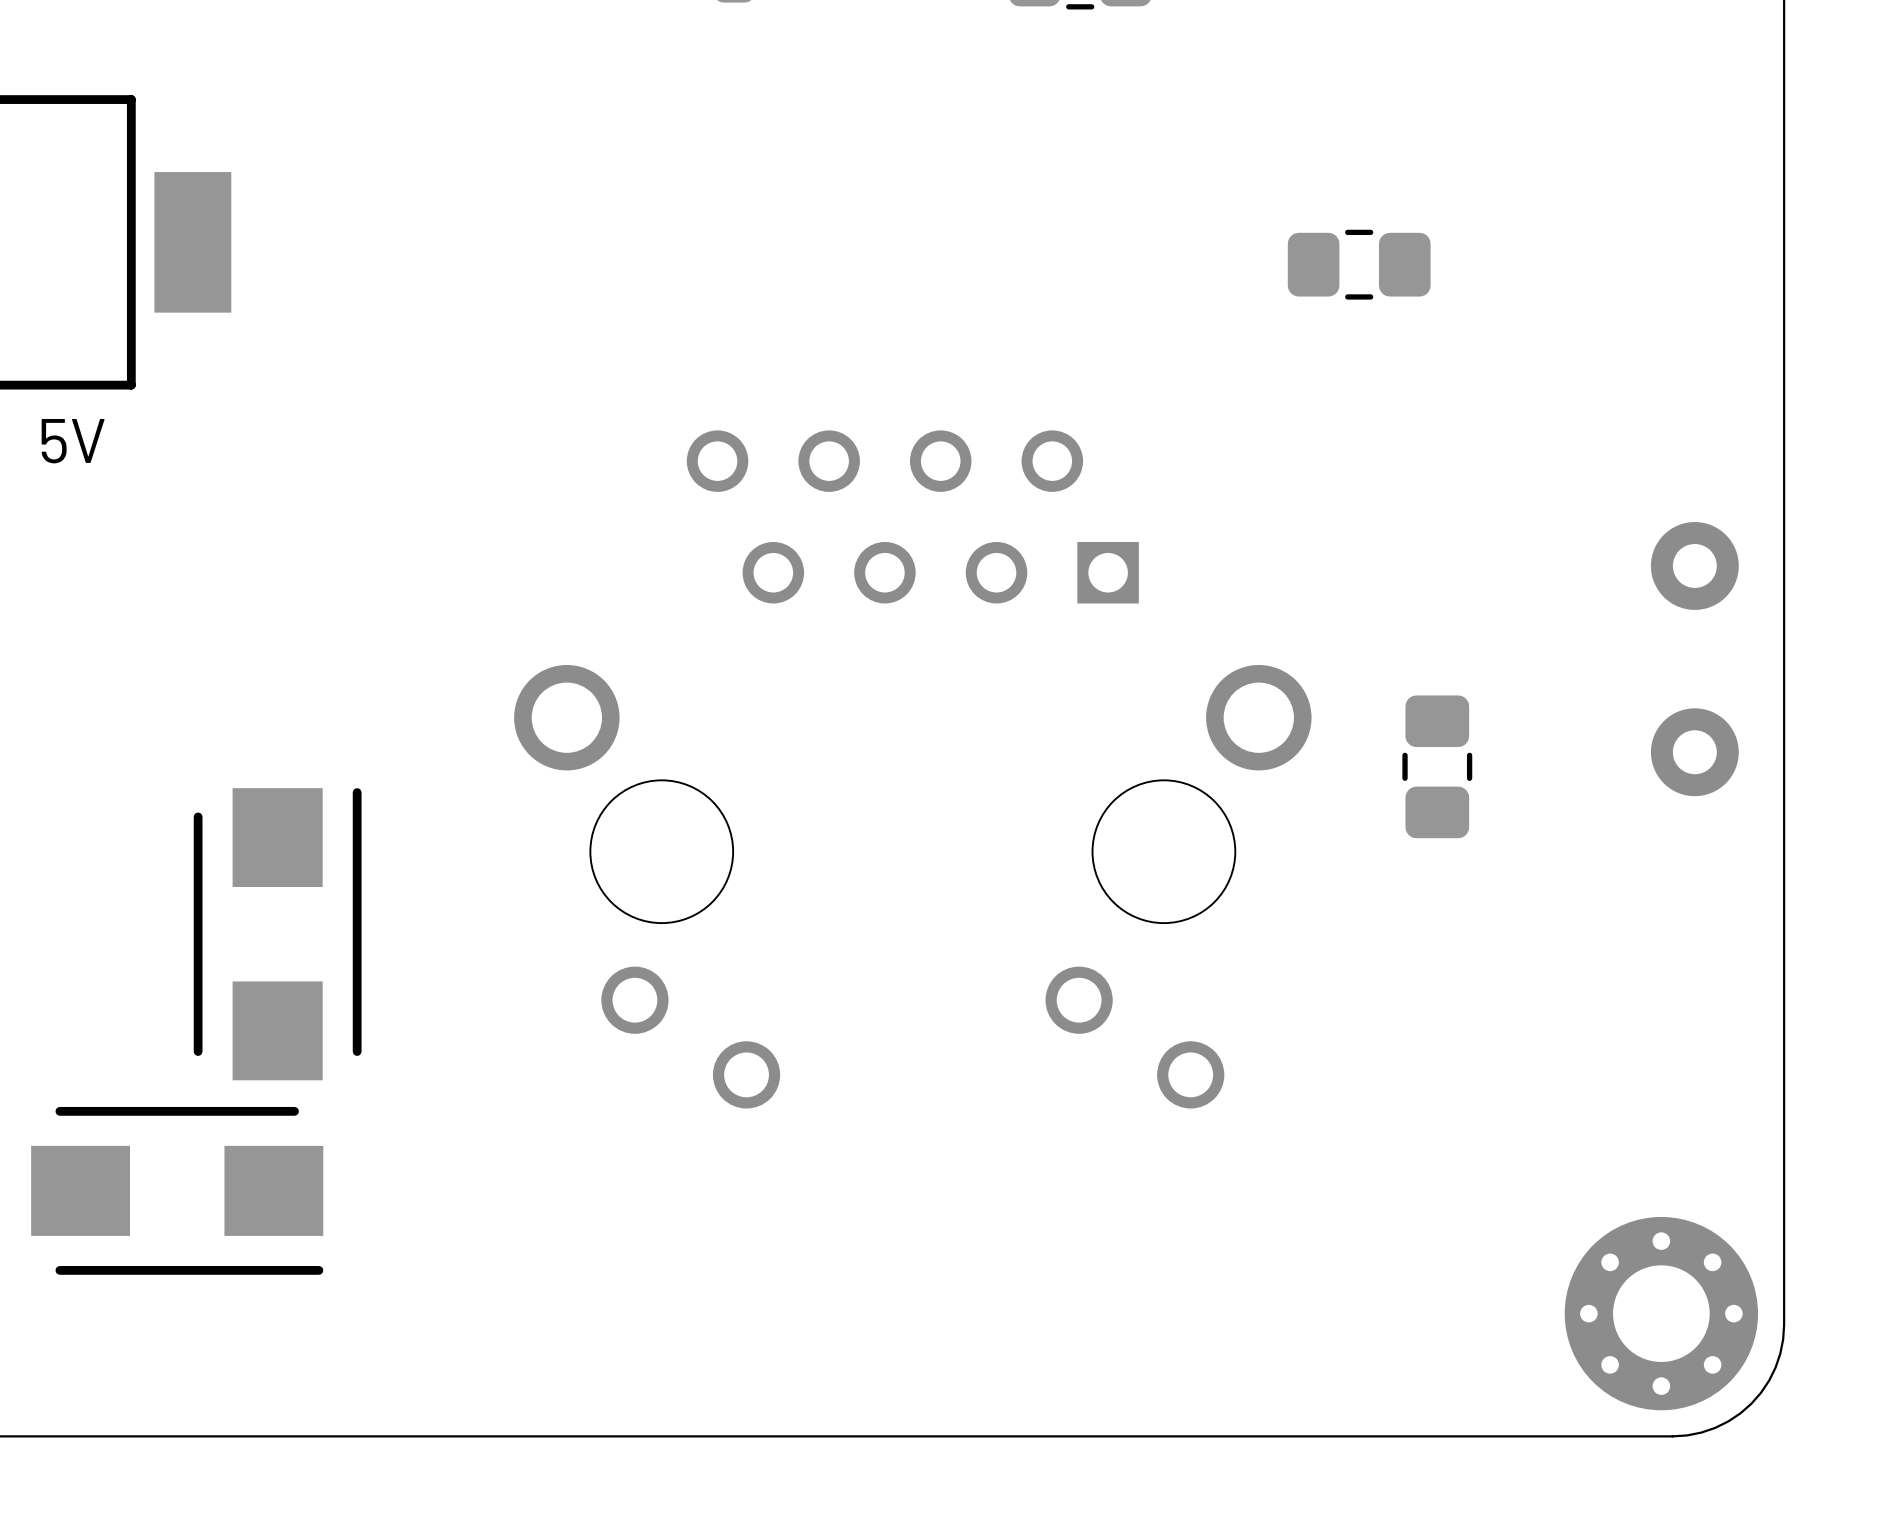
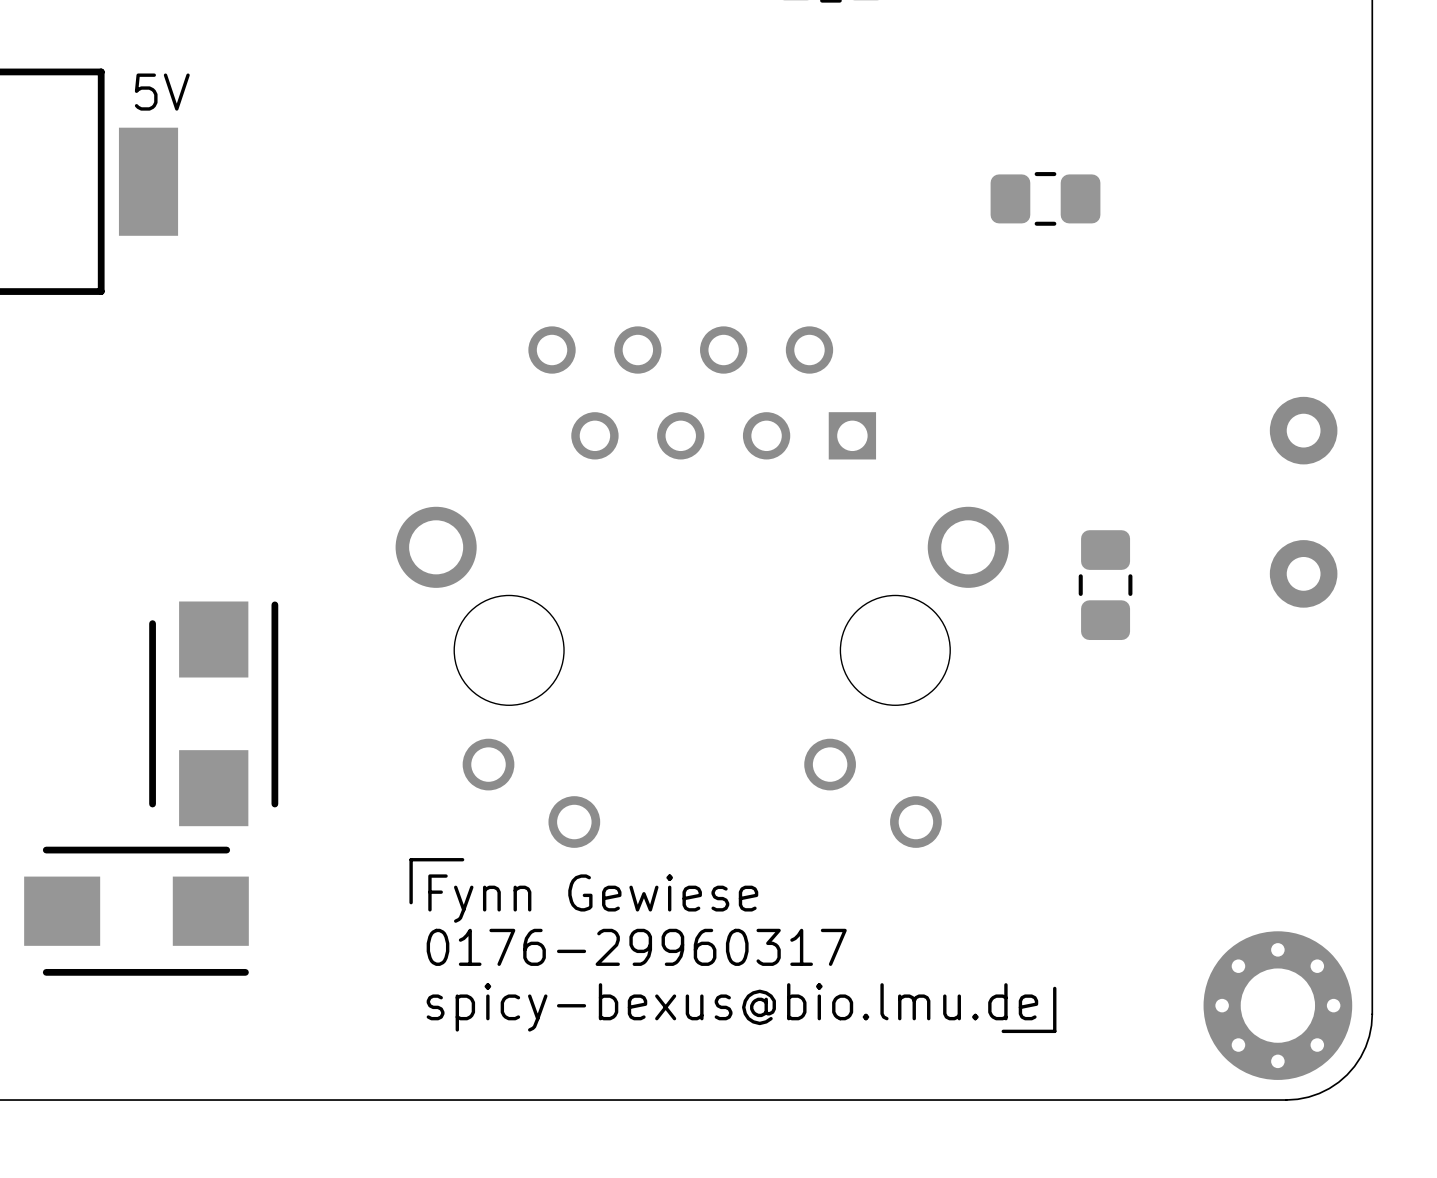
text position: 5V (73, 441) -> 5V (162, 92)
line: none -> (462, 859) (411, 859) (411, 902)
text: none -> Fynn Gewiese (593, 898)
text: none -> 0176-29960317 (636, 947)
line: none -> (1054, 988) (1054, 1031) (1003, 1031)
text: none -> spicy-bexus@bio.lmu.de (732, 1007)

